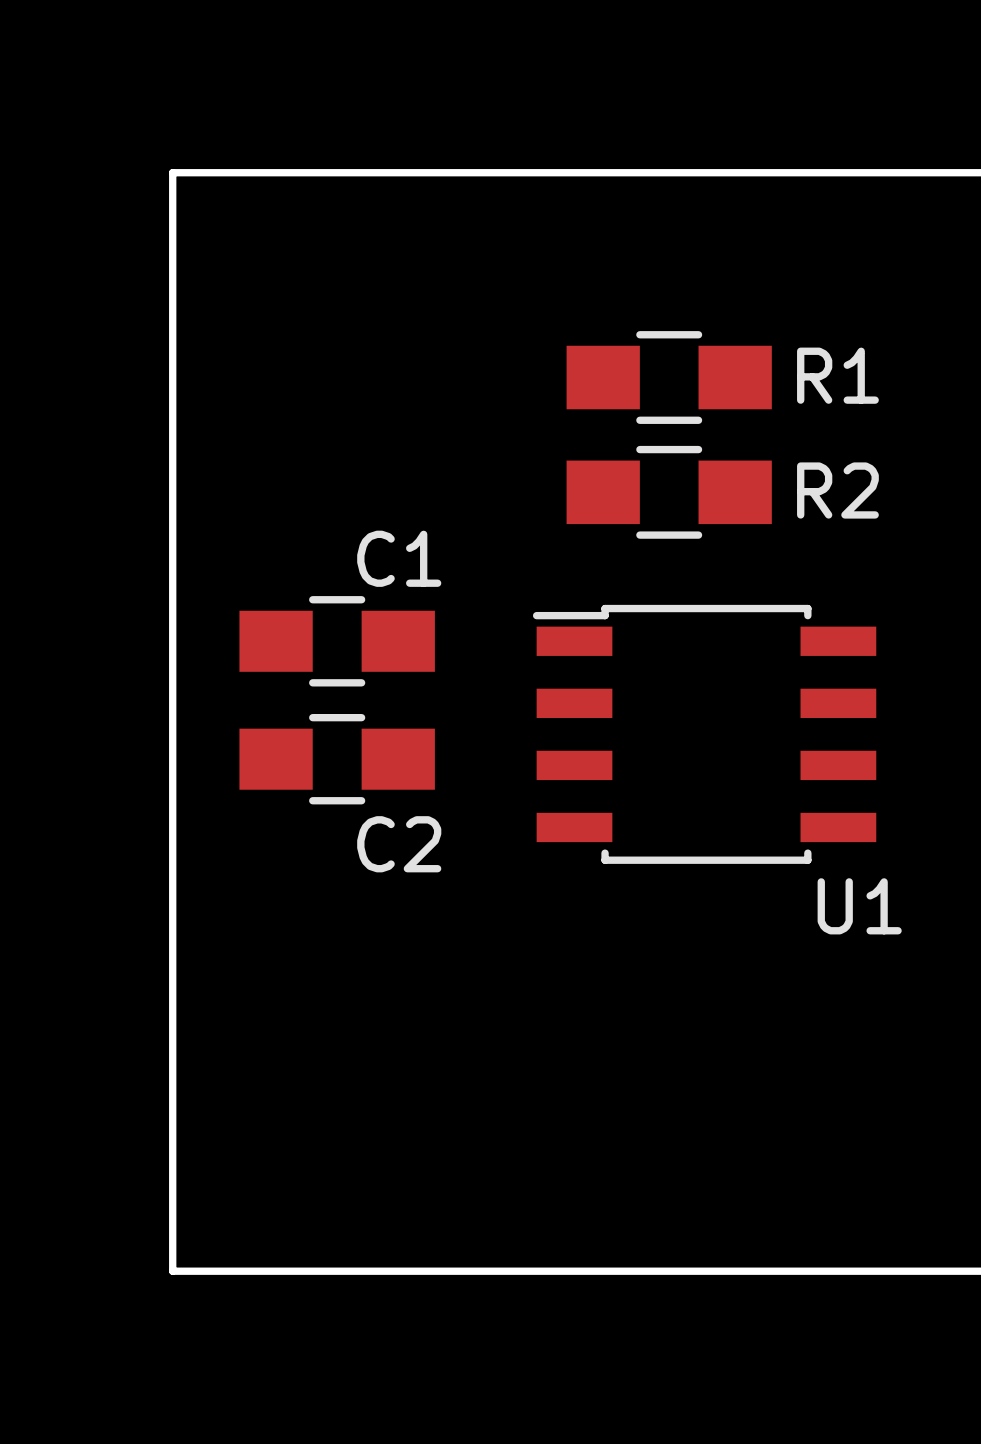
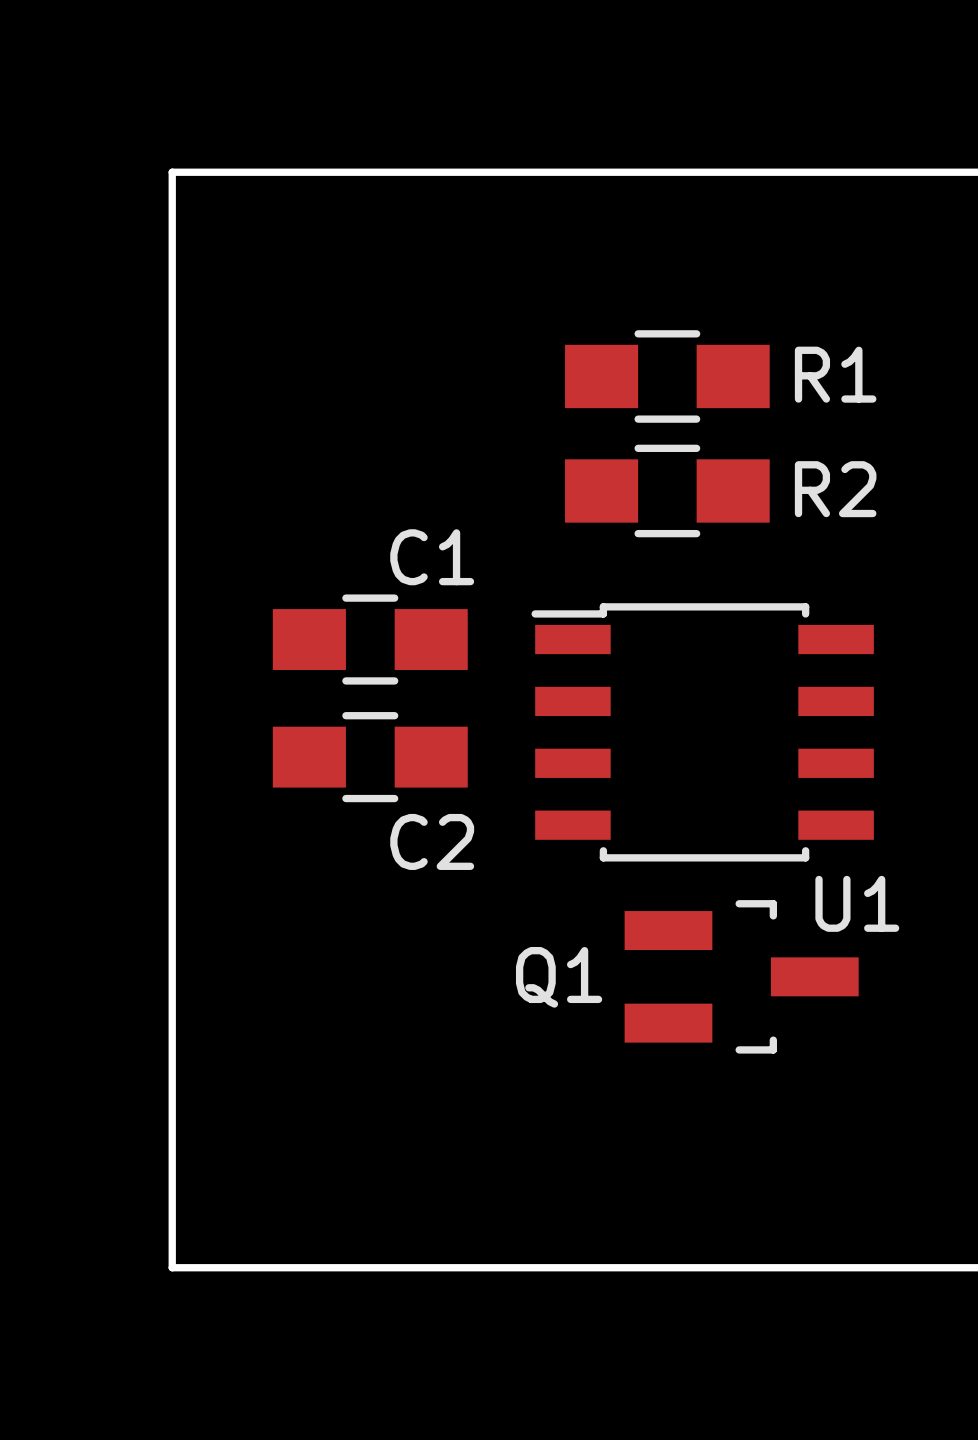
C1 position: (337, 641) -> (370, 639)
C2 position: (337, 759) -> (370, 757)
Q1: none -> (741, 976)

